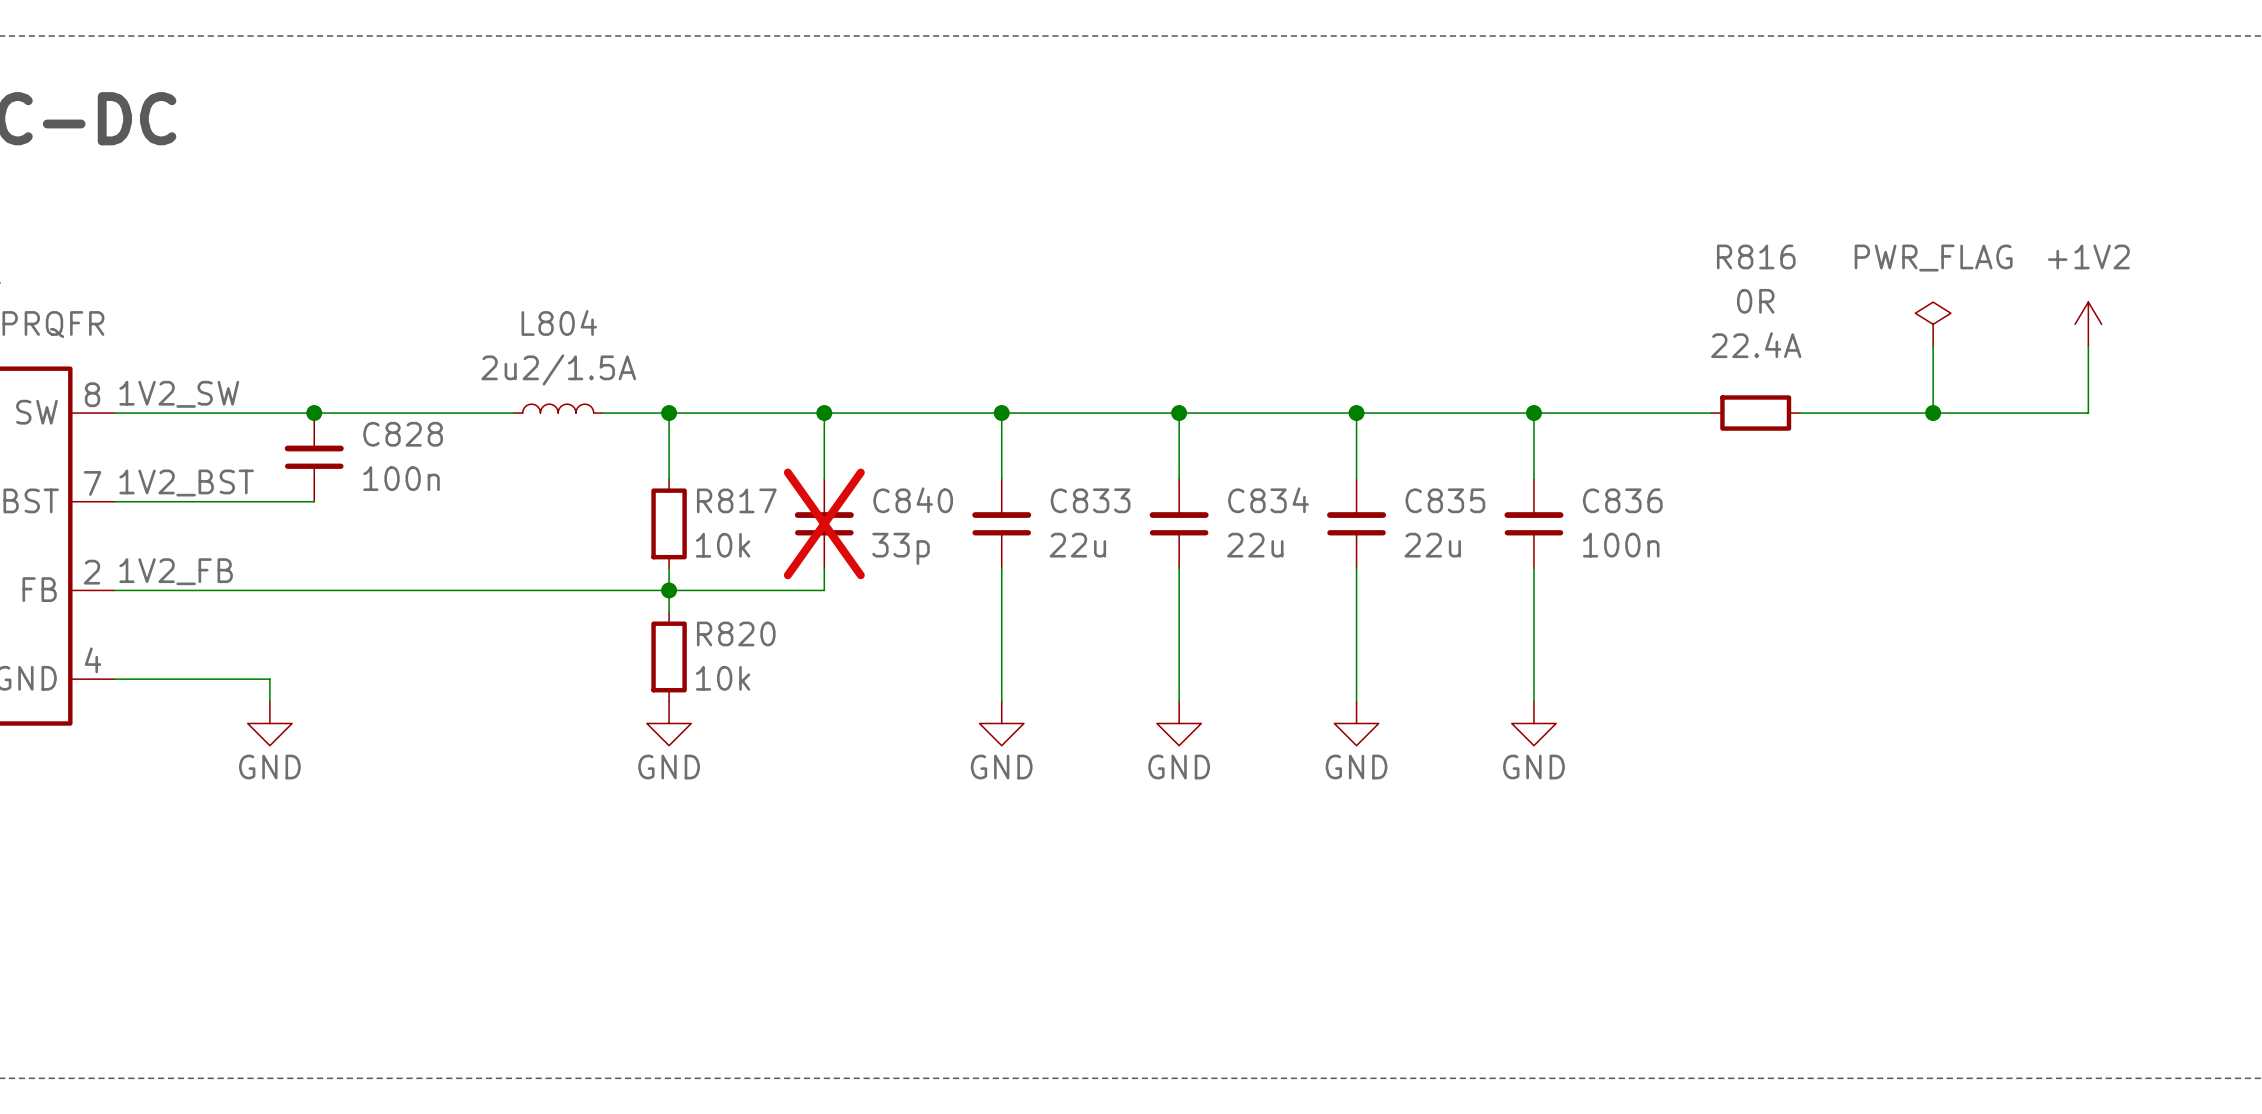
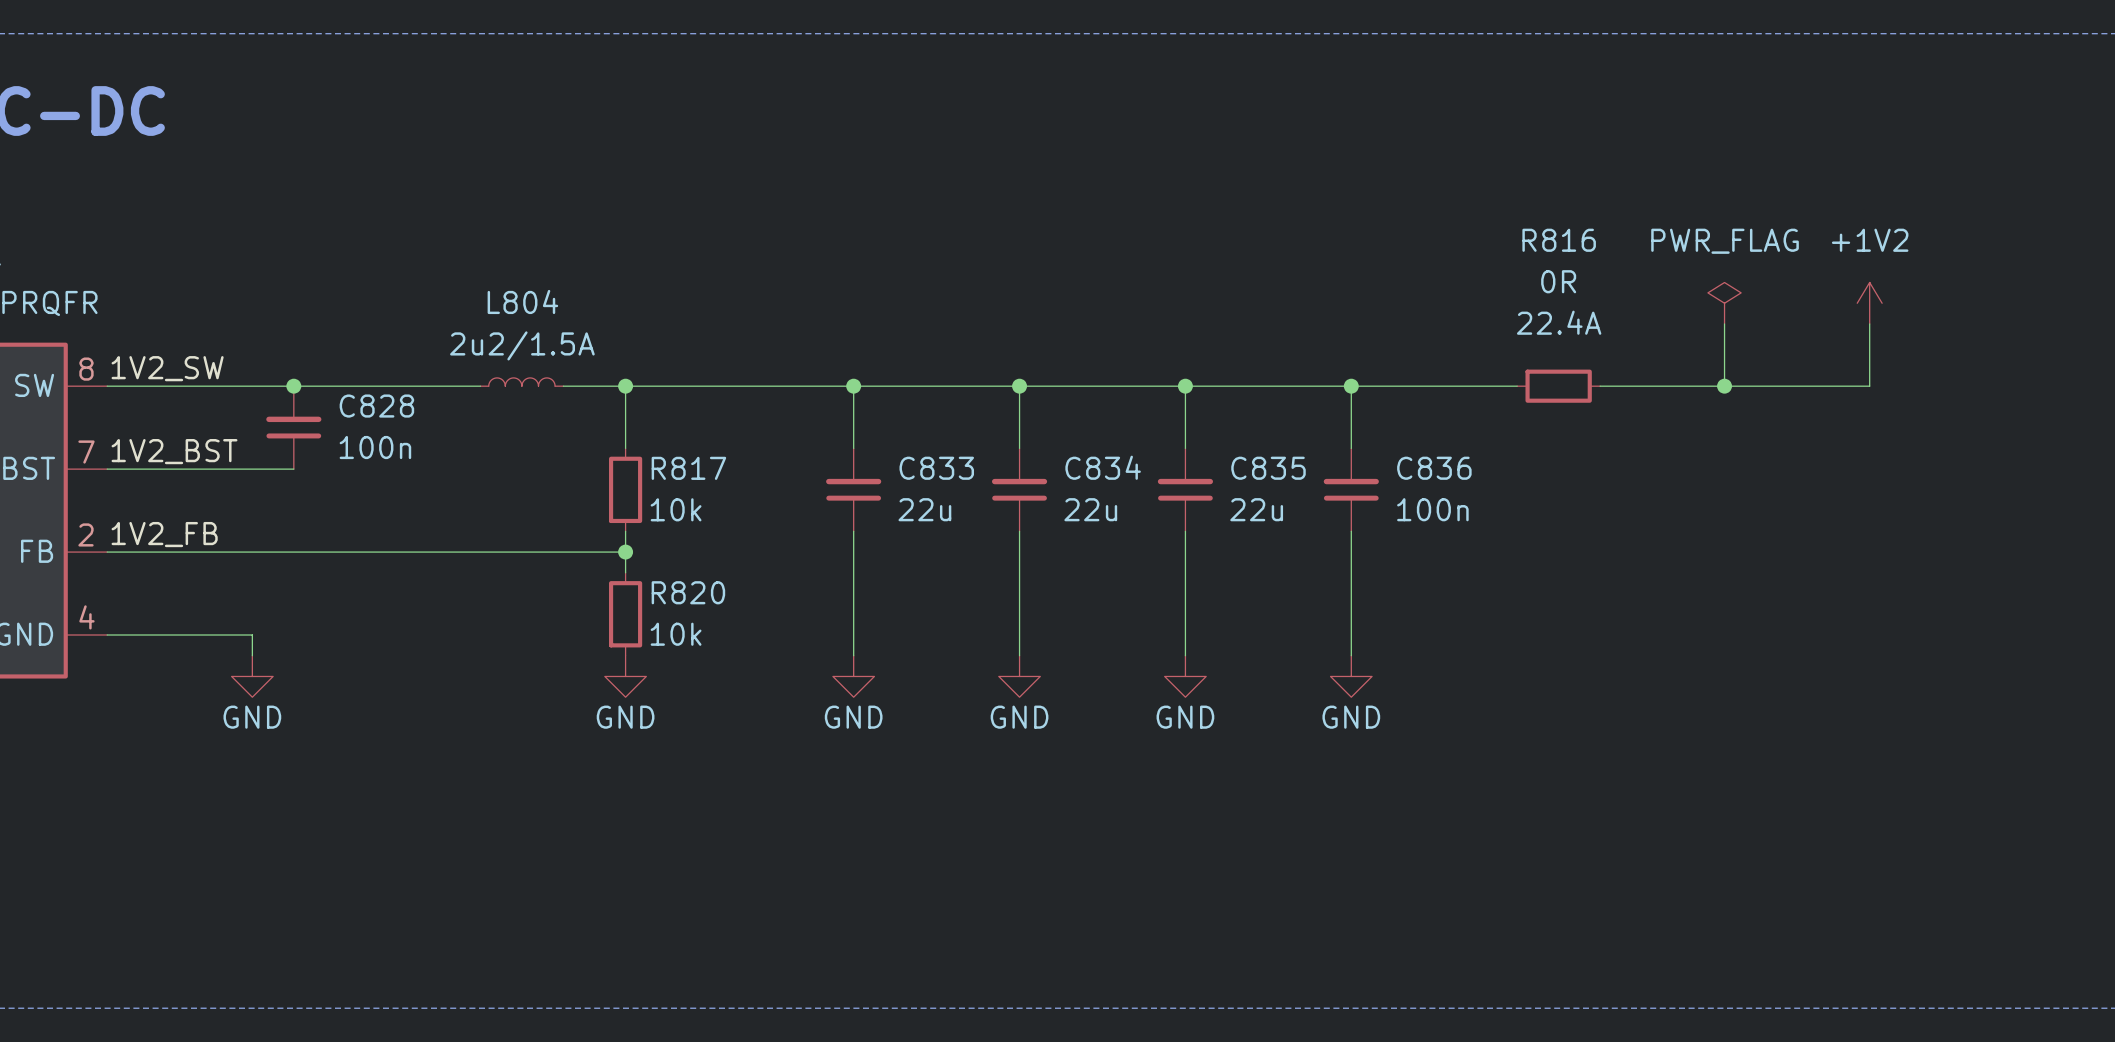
power symbol position: PWR_FLAG (1933, 324) -> PWR_FLAG (1724, 303)
power symbol position: +1V2 (2088, 324) -> +1V2 (1869, 303)
wire: (1933, 346) (1933, 413) -> (1724, 323) (1724, 386)
wire: (2088, 346) (2088, 413) (1999, 413) -> (1869, 323) (1869, 386)
wire: (824, 413) (824, 479) -> none
junction: (824, 413) -> none
junction: none -> (853, 386)
wire: (1001, 413) (1001, 479) -> (853, 386) (853, 448)
junction: (1001, 413) -> none
junction: none -> (1019, 386)
wire: (1179, 413) (1179, 479) -> (1019, 386) (1019, 448)
junction: (1179, 413) -> none
junction: none -> (1185, 386)
wire: (1356, 413) (1356, 479) -> (1185, 386) (1185, 448)
junction: (1356, 413) -> none
junction: none -> (1351, 386)
wire: (1533, 413) (1533, 479) -> (1351, 386) (1351, 448)
junction: (1533, 413) -> none
wire: (1622, 413) (1711, 413) -> (1683, 386) (1600, 386)
R816 position: (1755, 413) -> (1558, 386)
junction position: (1933, 413) -> (1724, 386)
C840: (824, 523) -> none
C833 position: (1001, 523) -> (853, 489)
C834 position: (1179, 523) -> (1019, 489)
C835 position: (1356, 523) -> (1185, 489)
C836 position: (1533, 523) -> (1351, 489)
wire: (824, 568) (824, 590) (669, 590) -> none
wire: (1001, 568) (1001, 701) -> (853, 531) (853, 655)
wire: (1179, 568) (1179, 701) -> (1019, 531) (1019, 655)
wire: (1356, 568) (1356, 701) -> (1185, 531) (1185, 655)
wire: (1533, 568) (1533, 701) -> (1351, 531) (1351, 655)
power symbol: none -> GND (853, 676)
power symbol: GND (1001, 723) -> none
power symbol: none -> GND (1019, 676)
power symbol: GND (1179, 723) -> none
power symbol: none -> GND (1185, 676)
power symbol: GND (1356, 723) -> none
power symbol: none -> GND (1351, 676)
power symbol: GND (1533, 723) -> none

